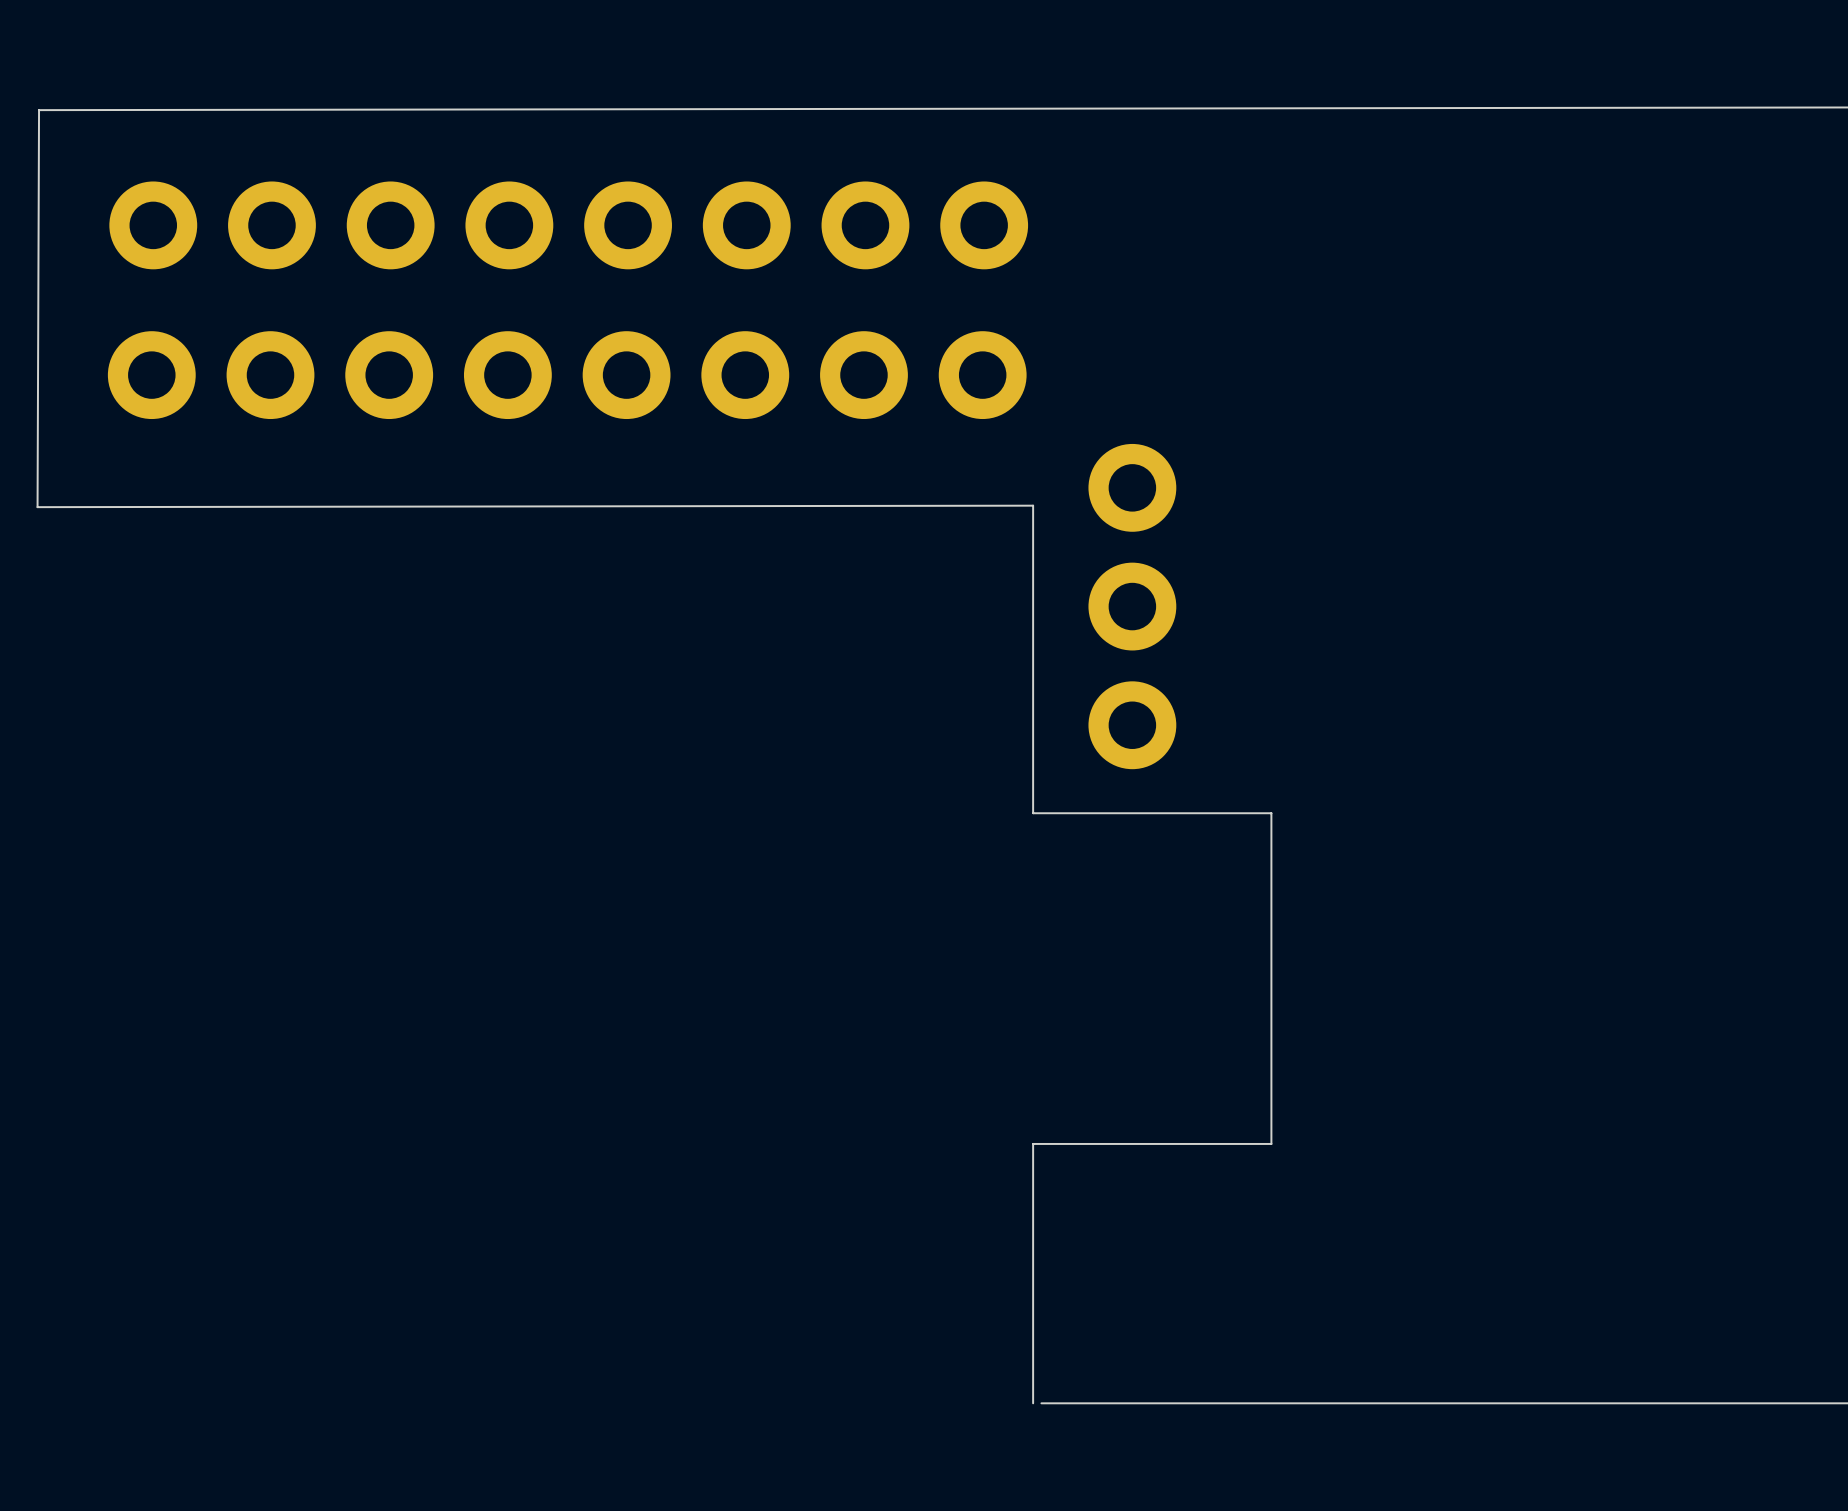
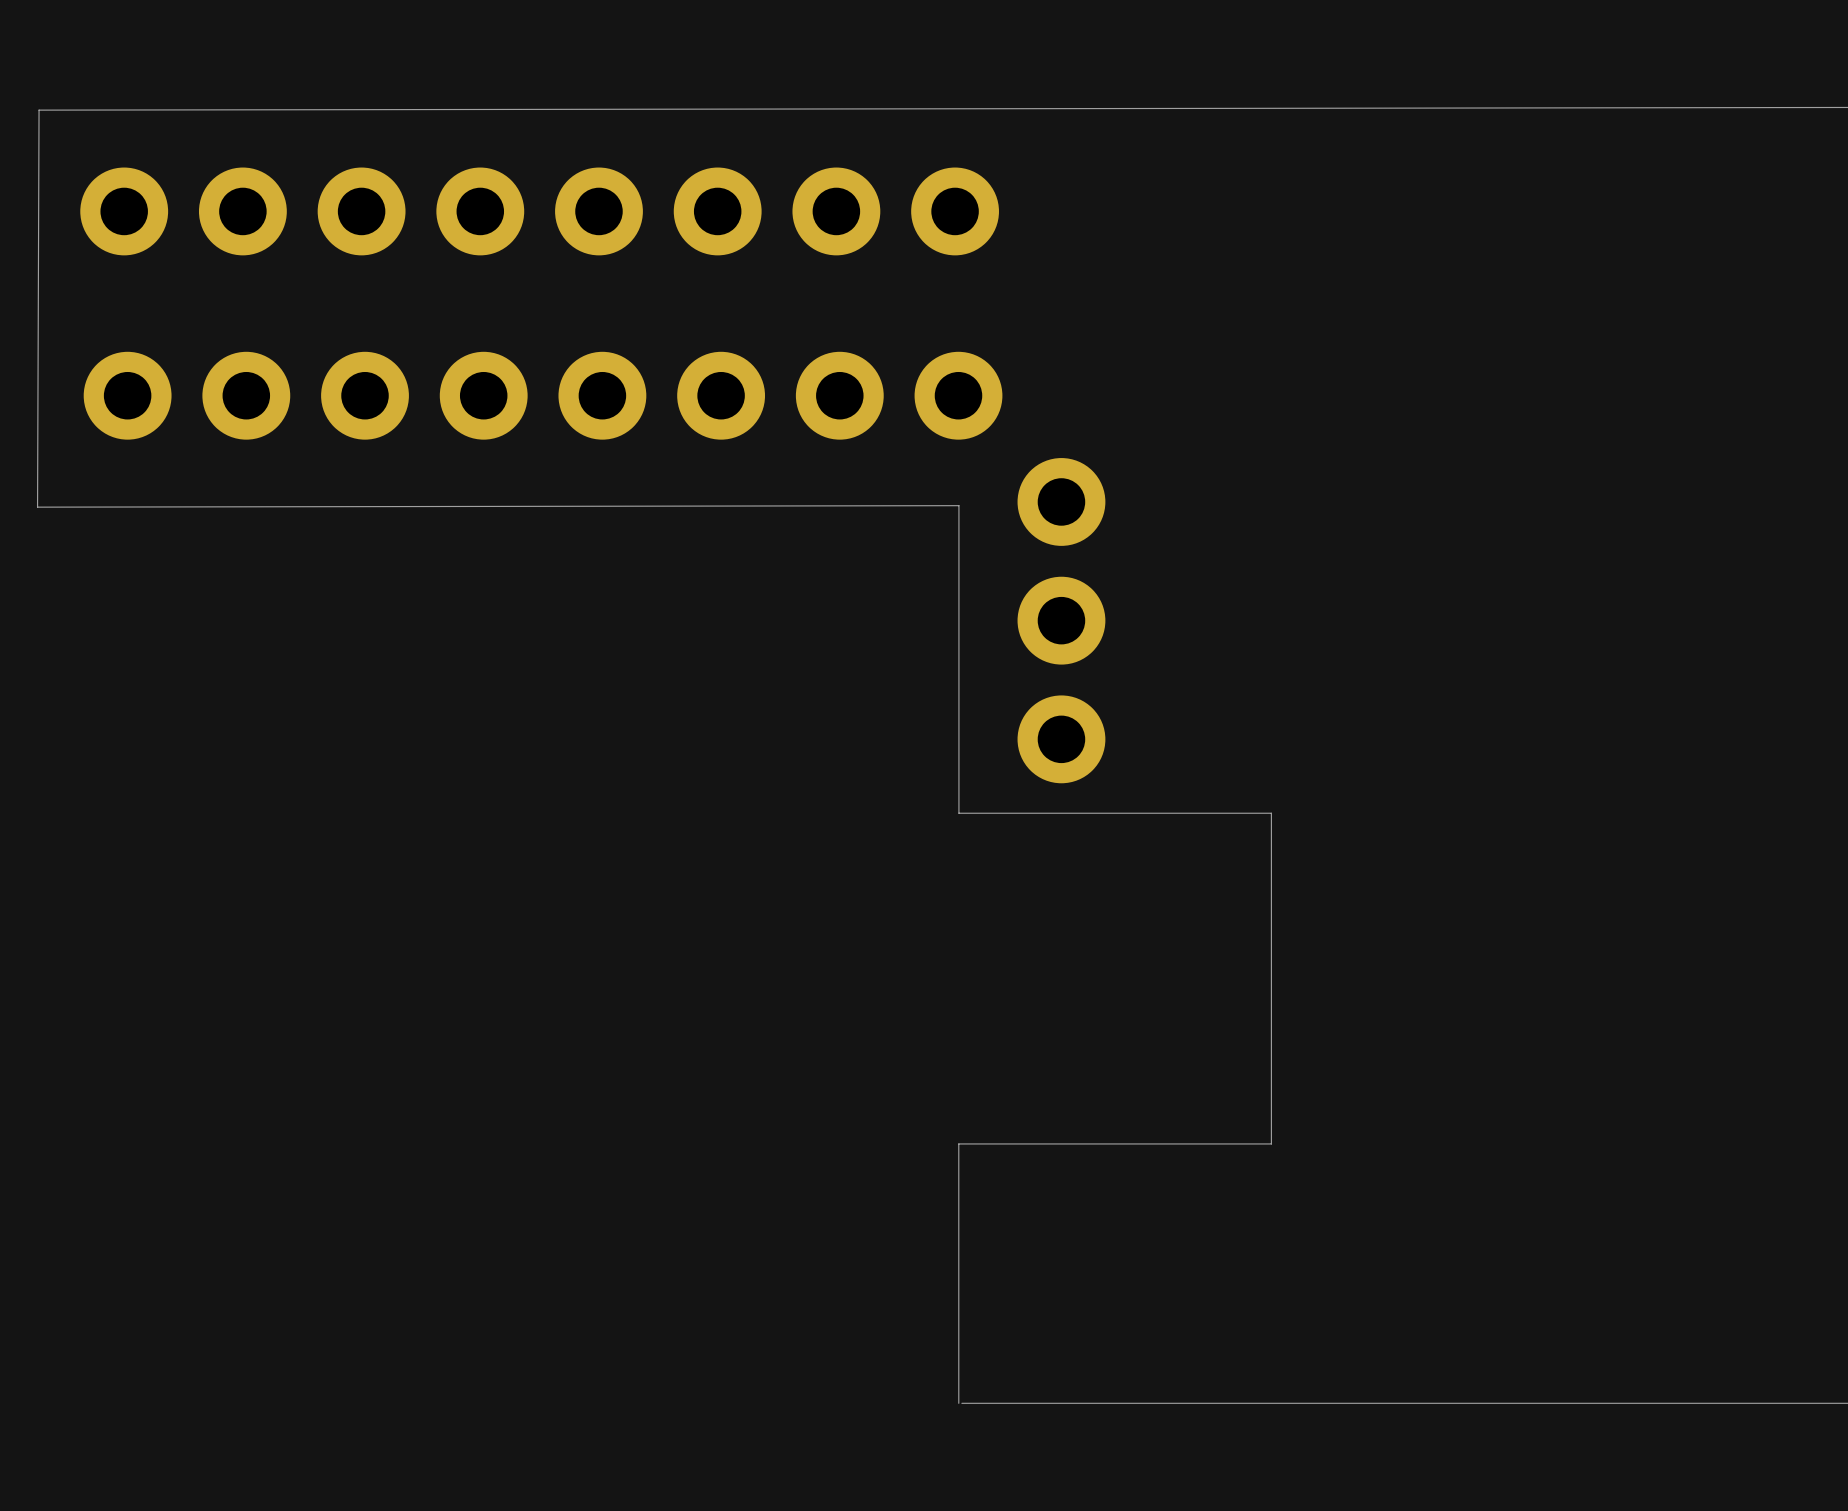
part position: (568, 225) -> (539, 211)
part position: (567, 375) -> (543, 395)
board edge: (37, 507) (1033, 505) (1033, 813) -> (37, 507) (958, 505) (958, 813) (1033, 813)
part position: (1132, 606) -> (1061, 620)
board edge: (1033, 1143) (1033, 1403) -> (1033, 1143) (958, 1143) (958, 1403)
board edge: none -> (1041, 1403) (961, 1403)

